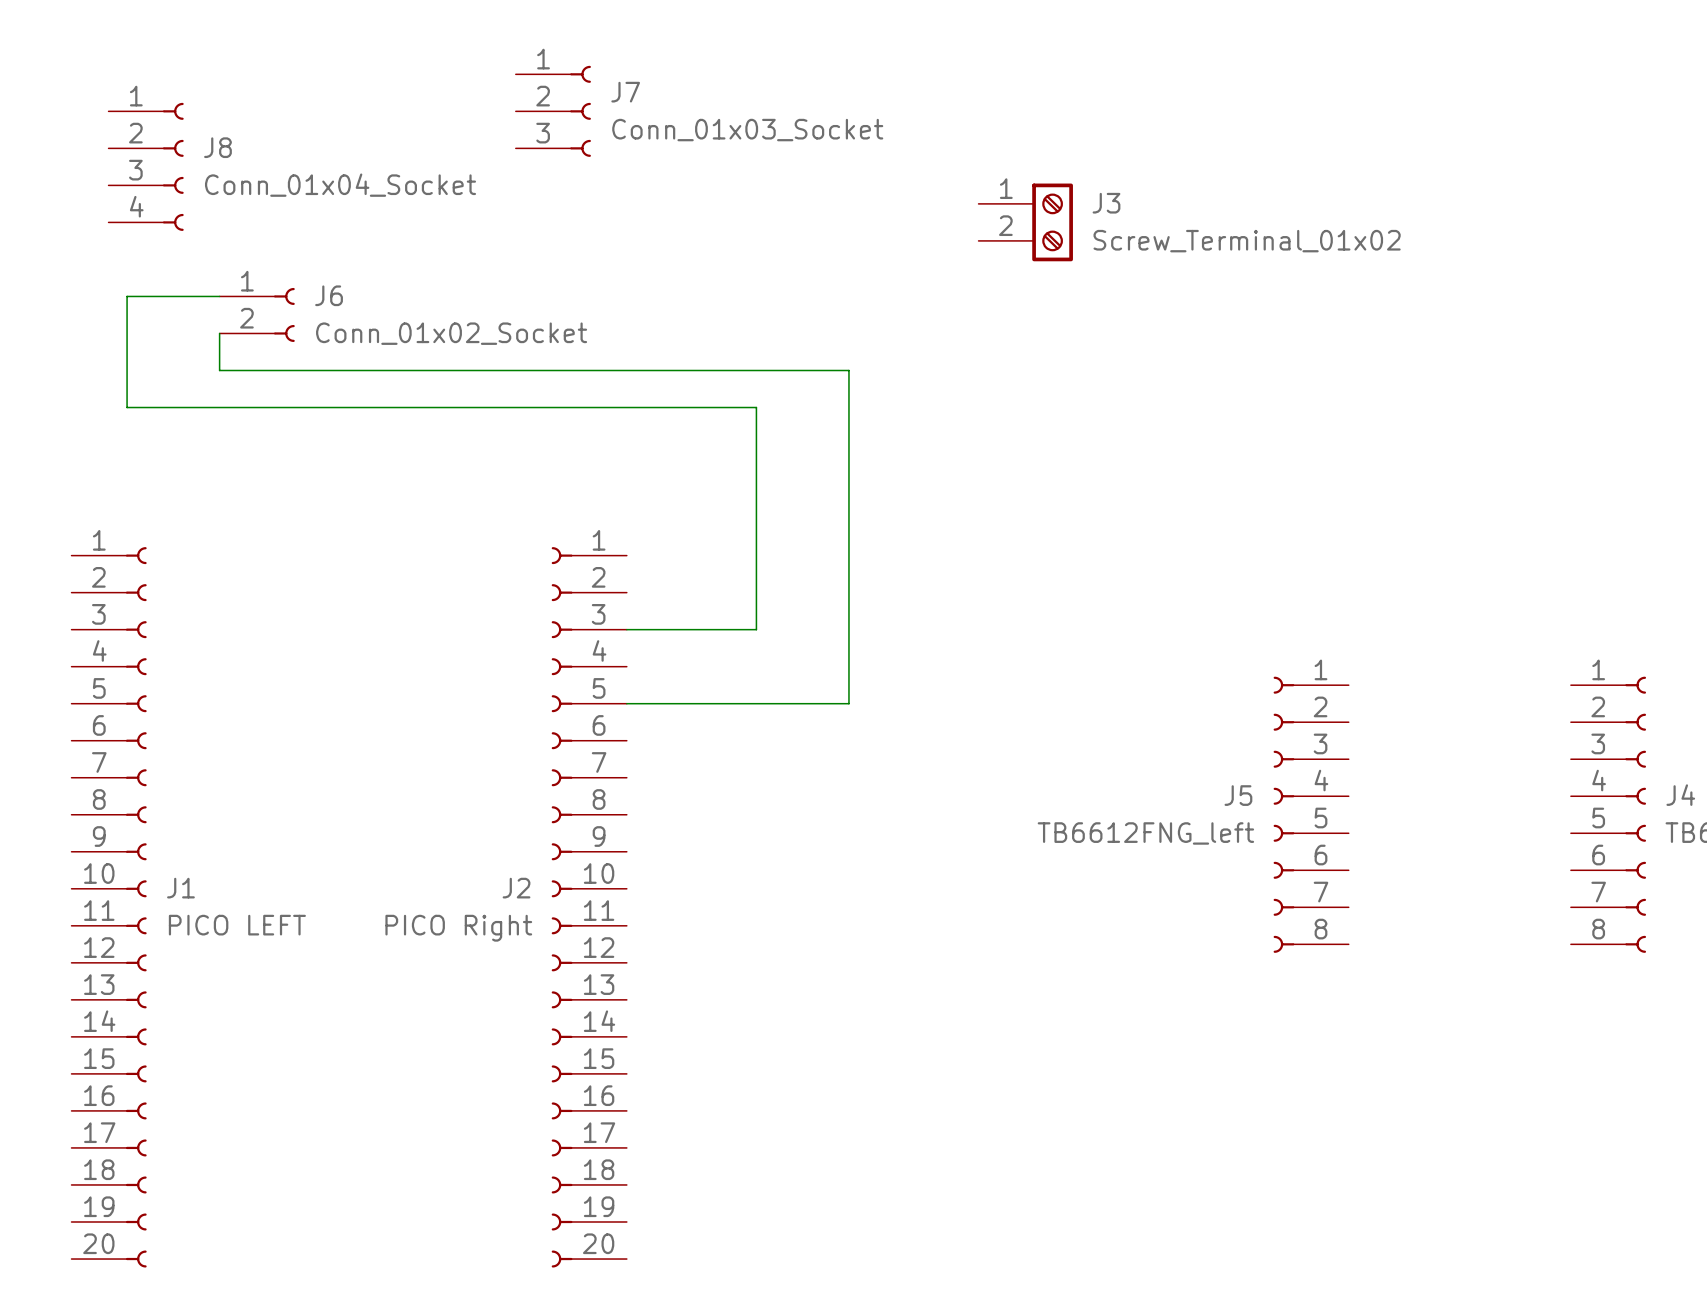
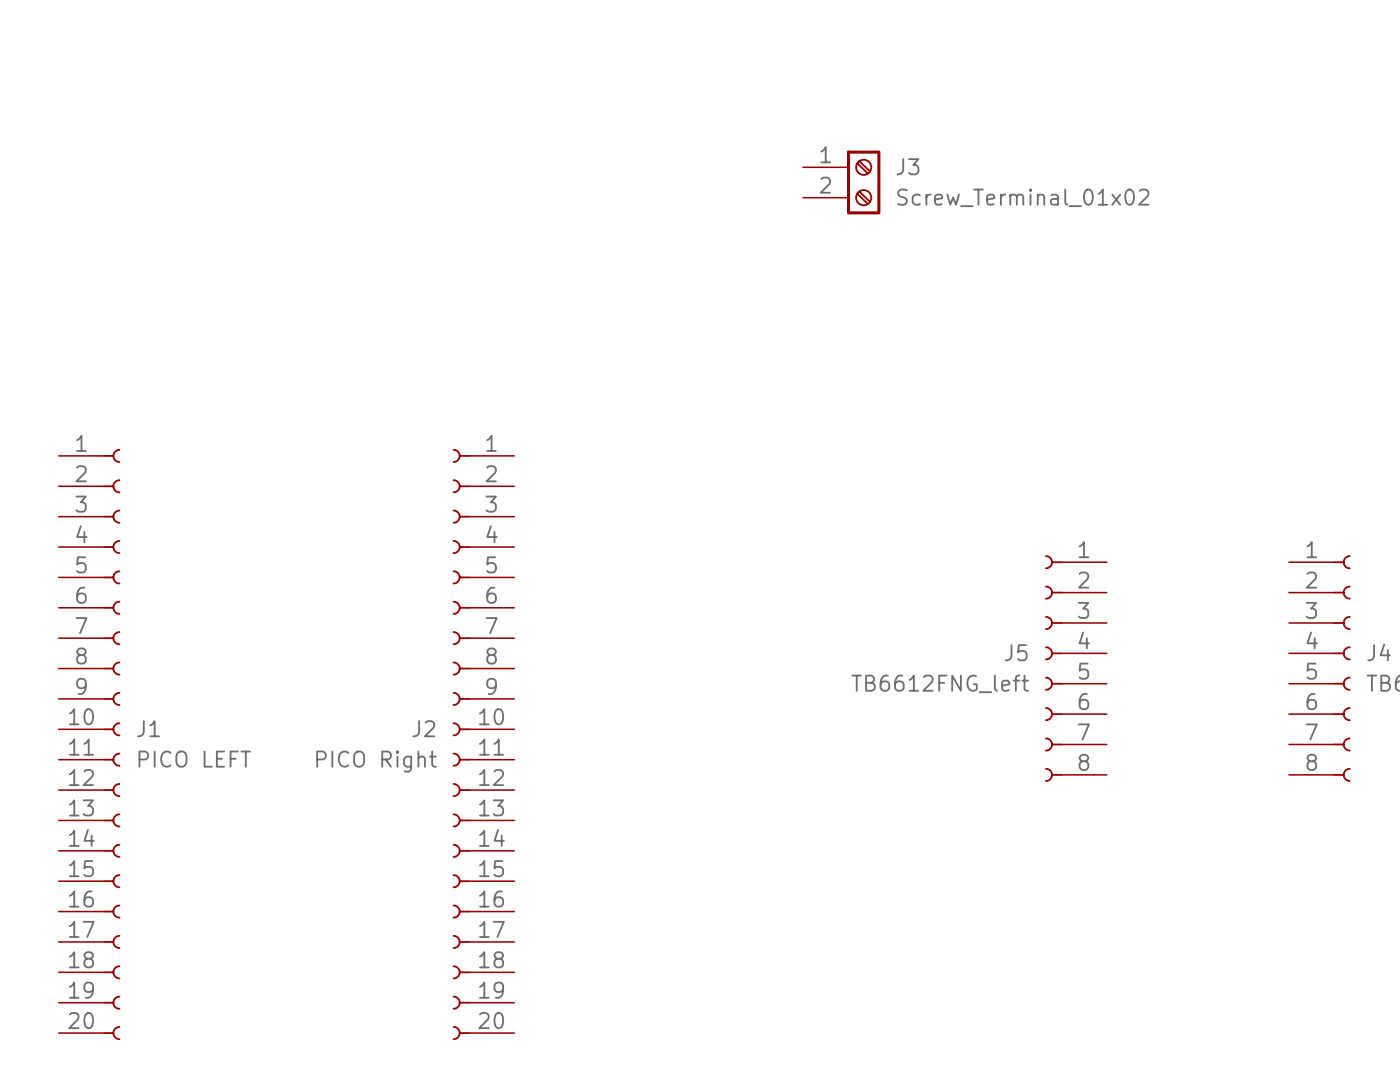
J7: Conn_01x03_Socket (553, 111) -> none
J8: Conn_01x04_Socket (146, 166) -> none
wire: (219, 296) (127, 296) (127, 407) (756, 407) (756, 629) (626, 629) -> none
J6: Conn_01x02_Socket (257, 314) -> none
wire: (219, 333) (219, 370) (848, 370) (848, 703) (626, 703) -> none

